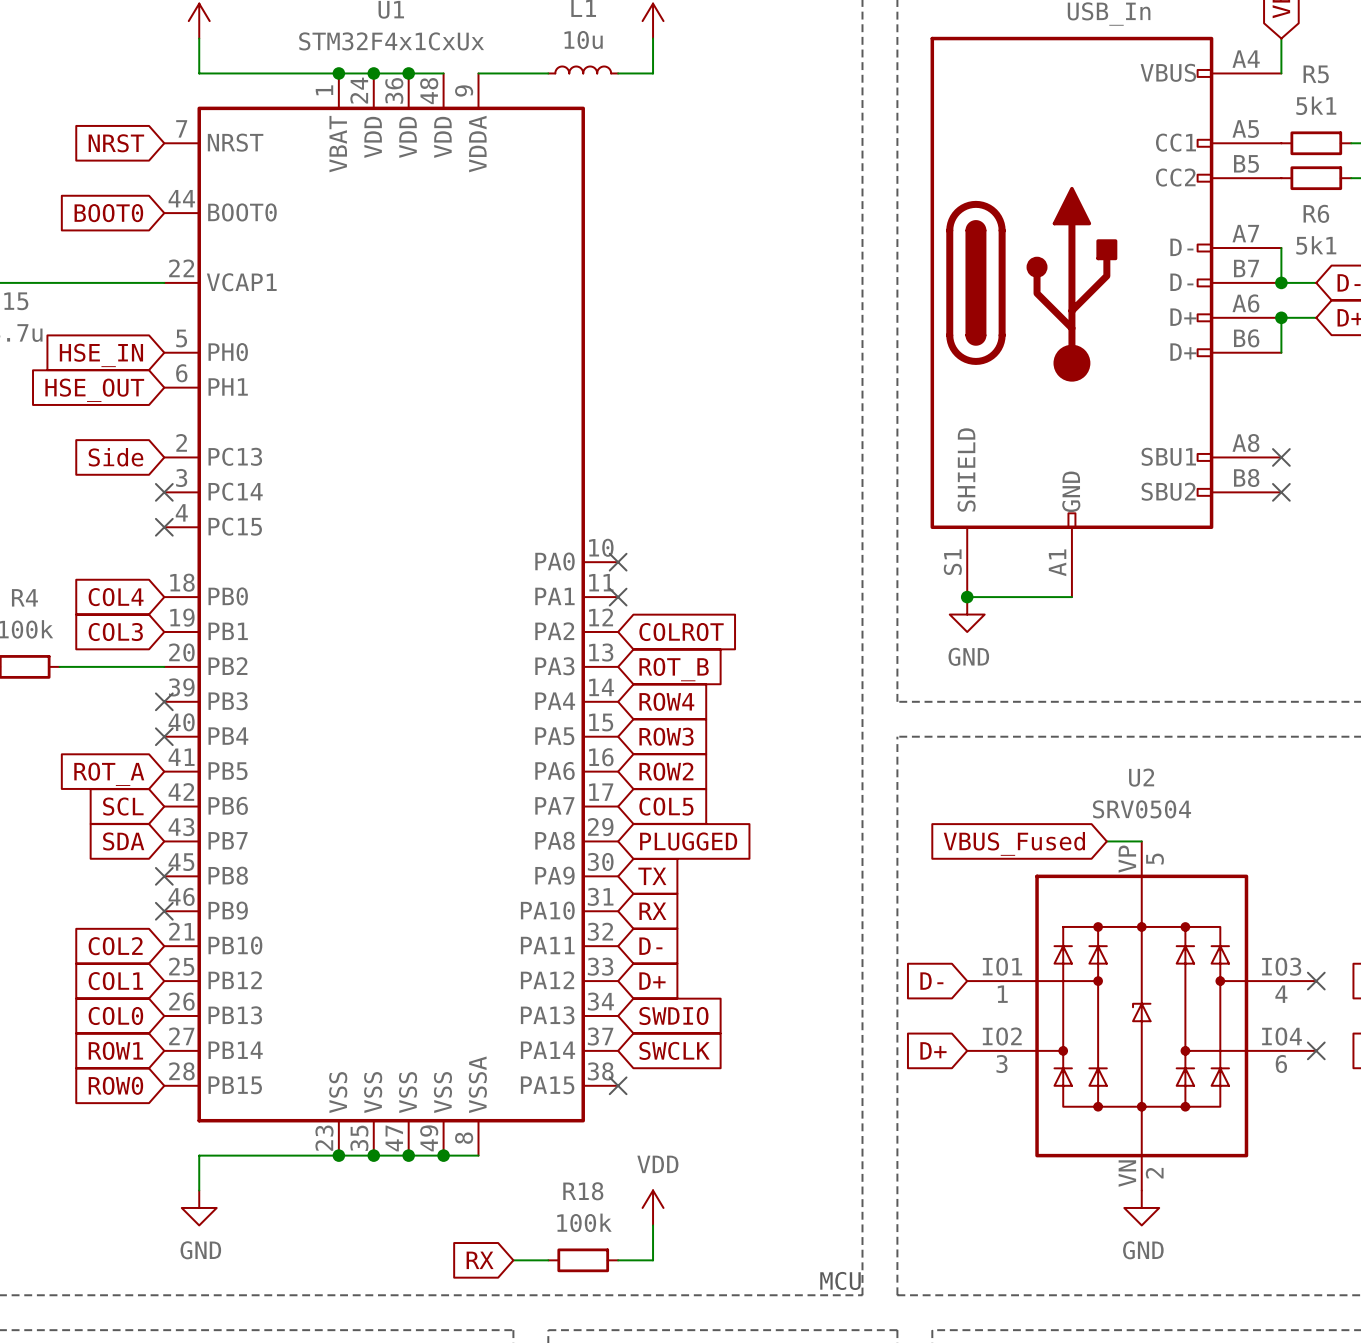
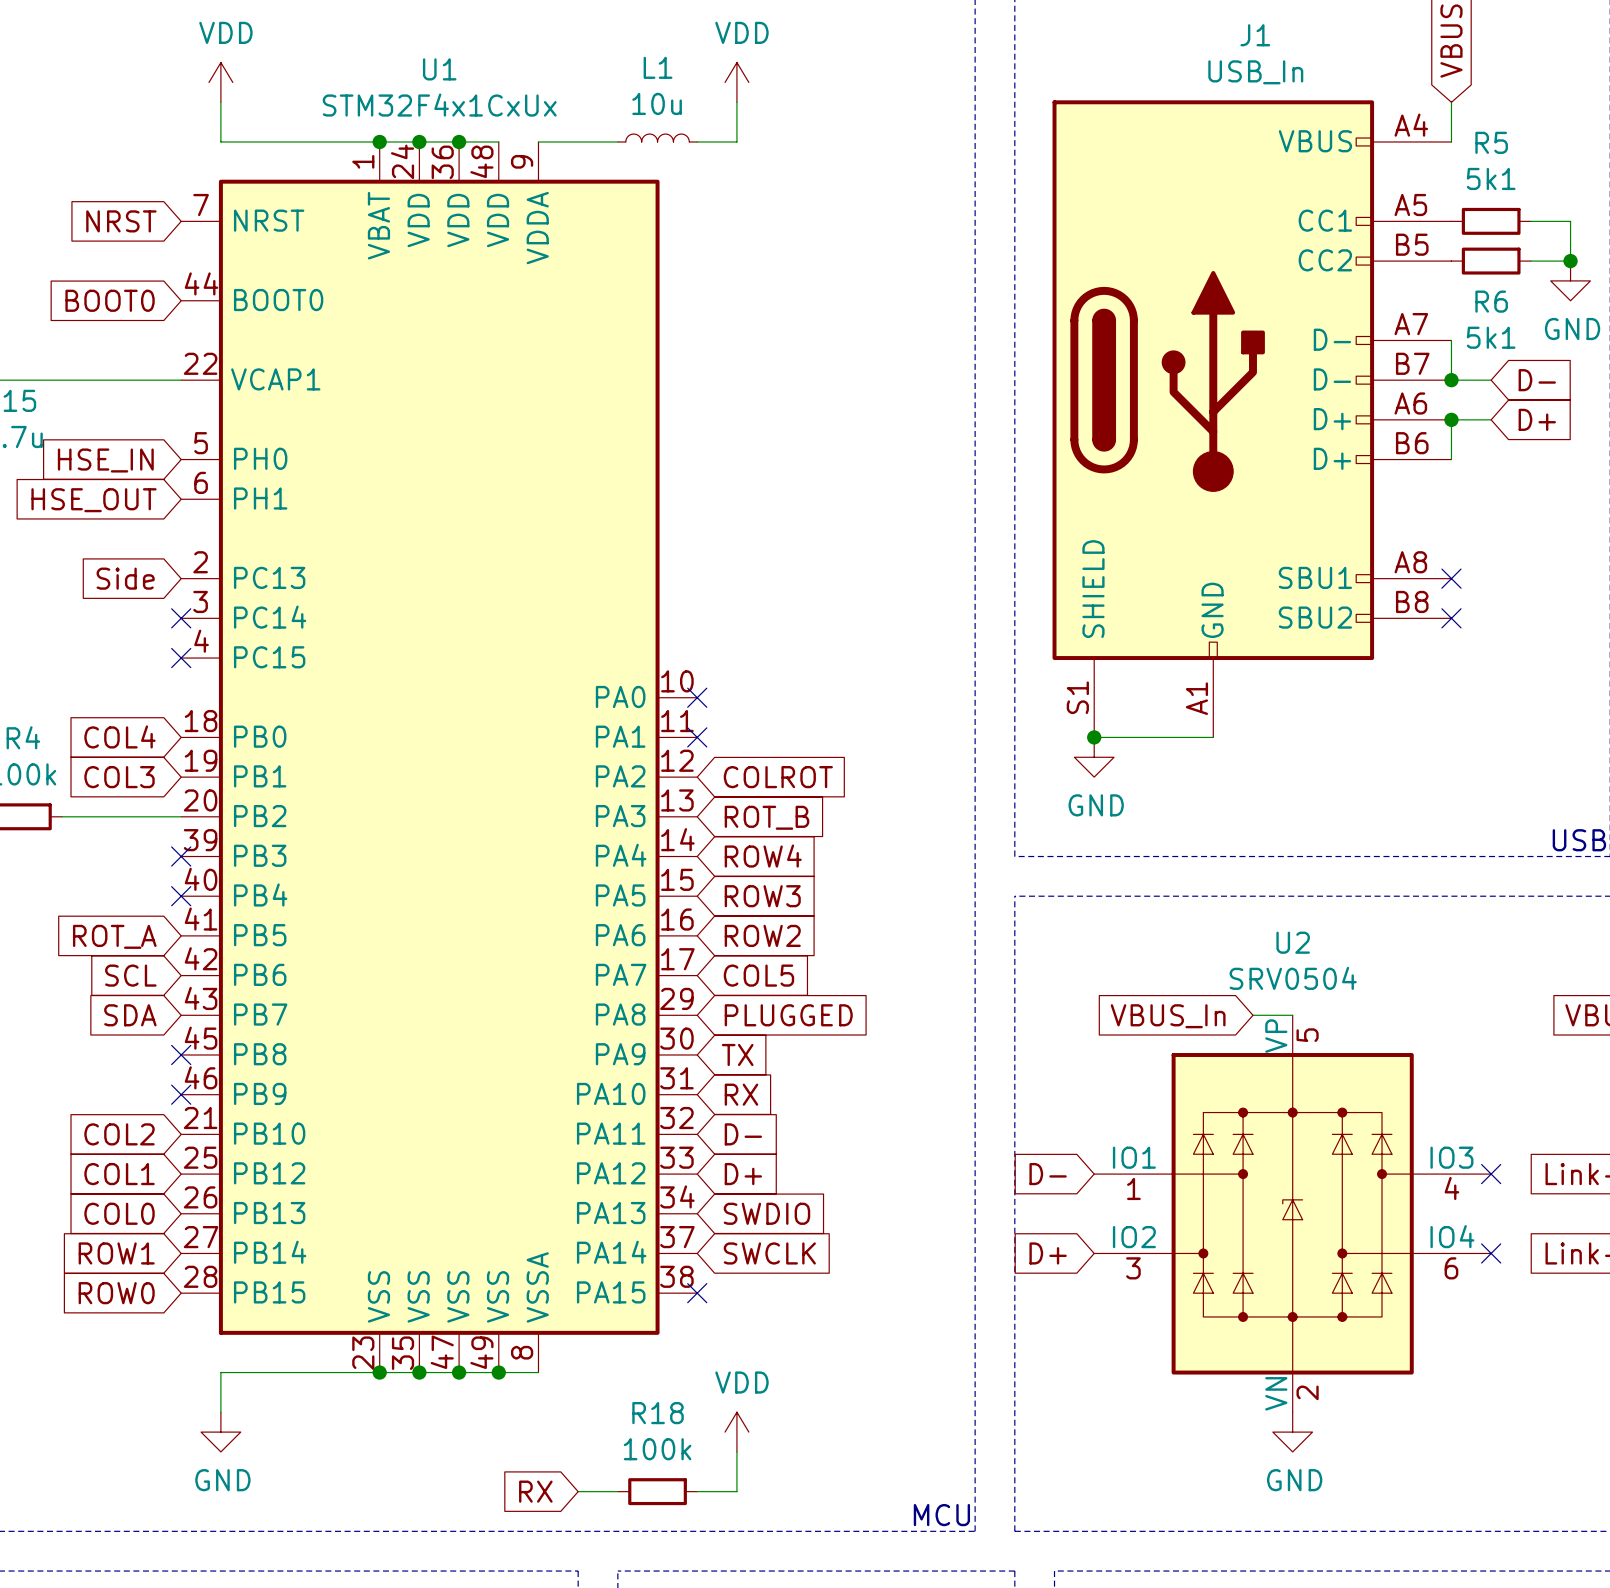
global label: VBUS_Fused (1014, 843) -> VBUS_In (1168, 1016)

